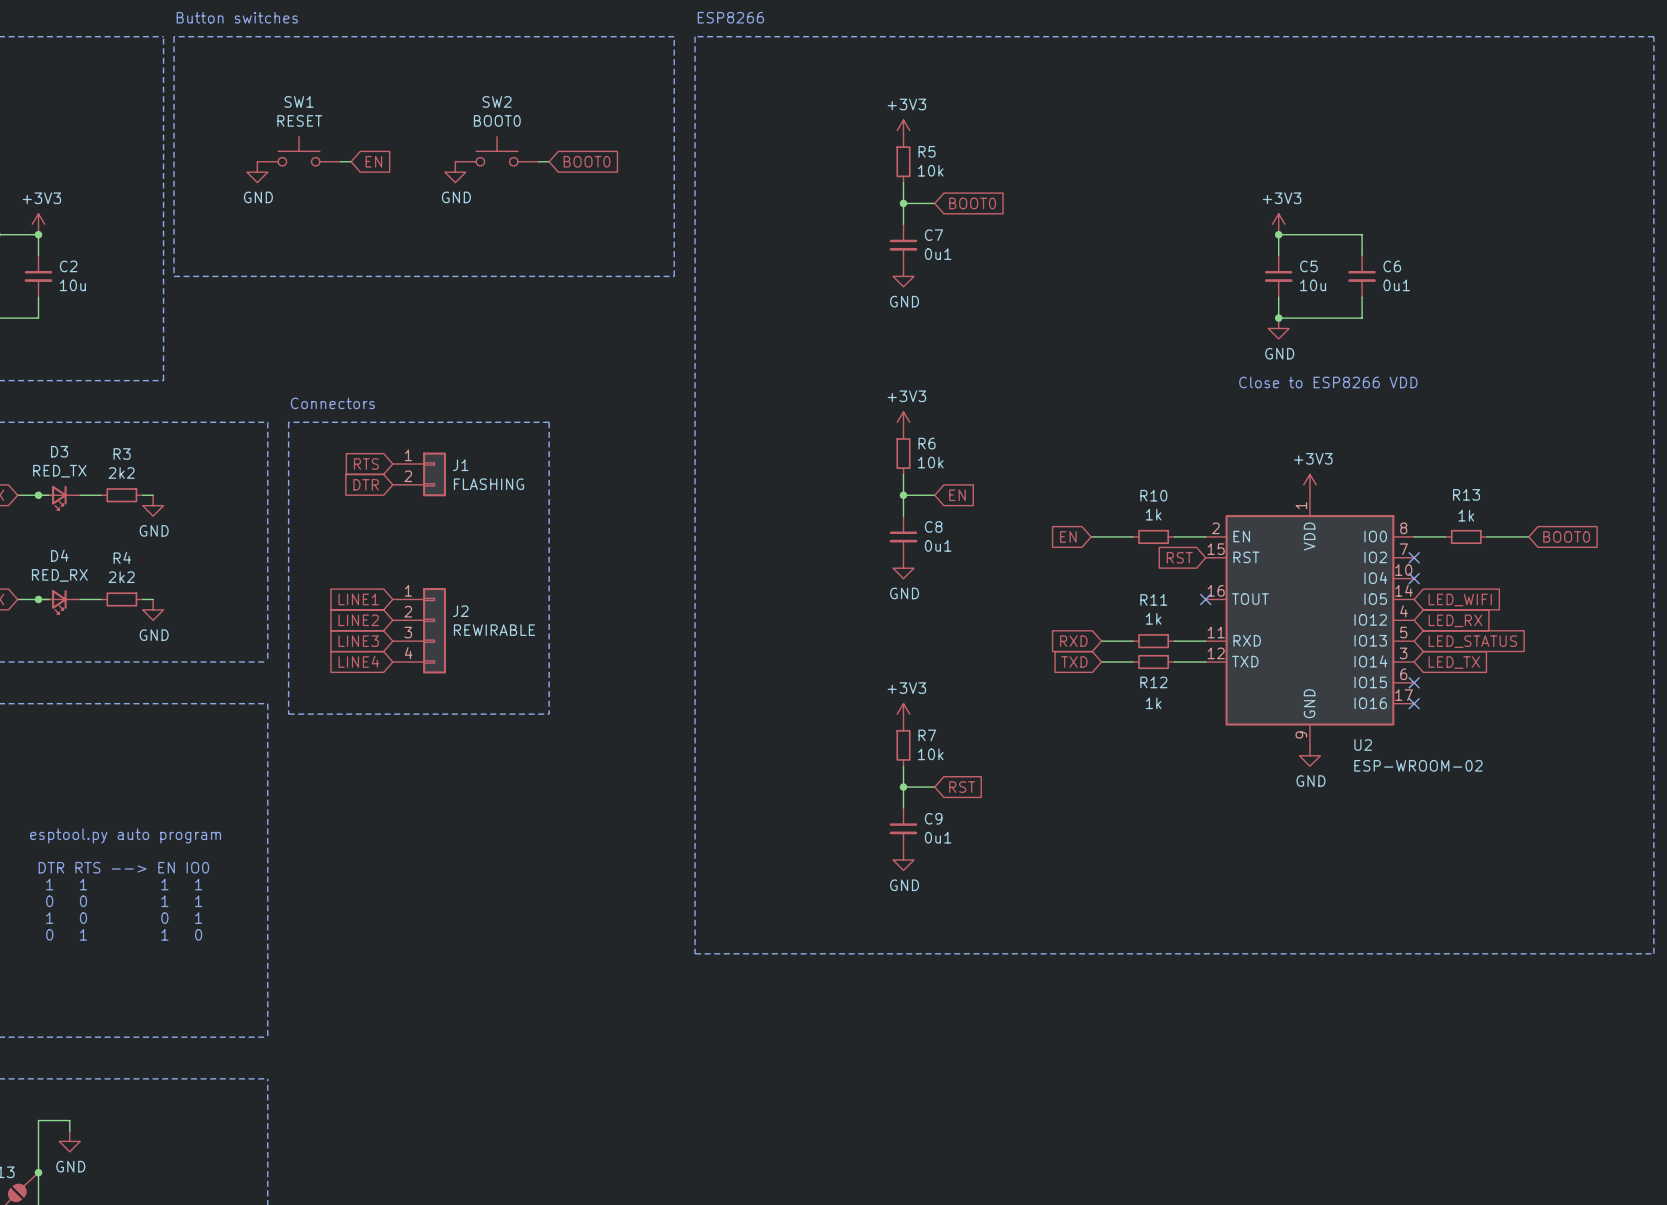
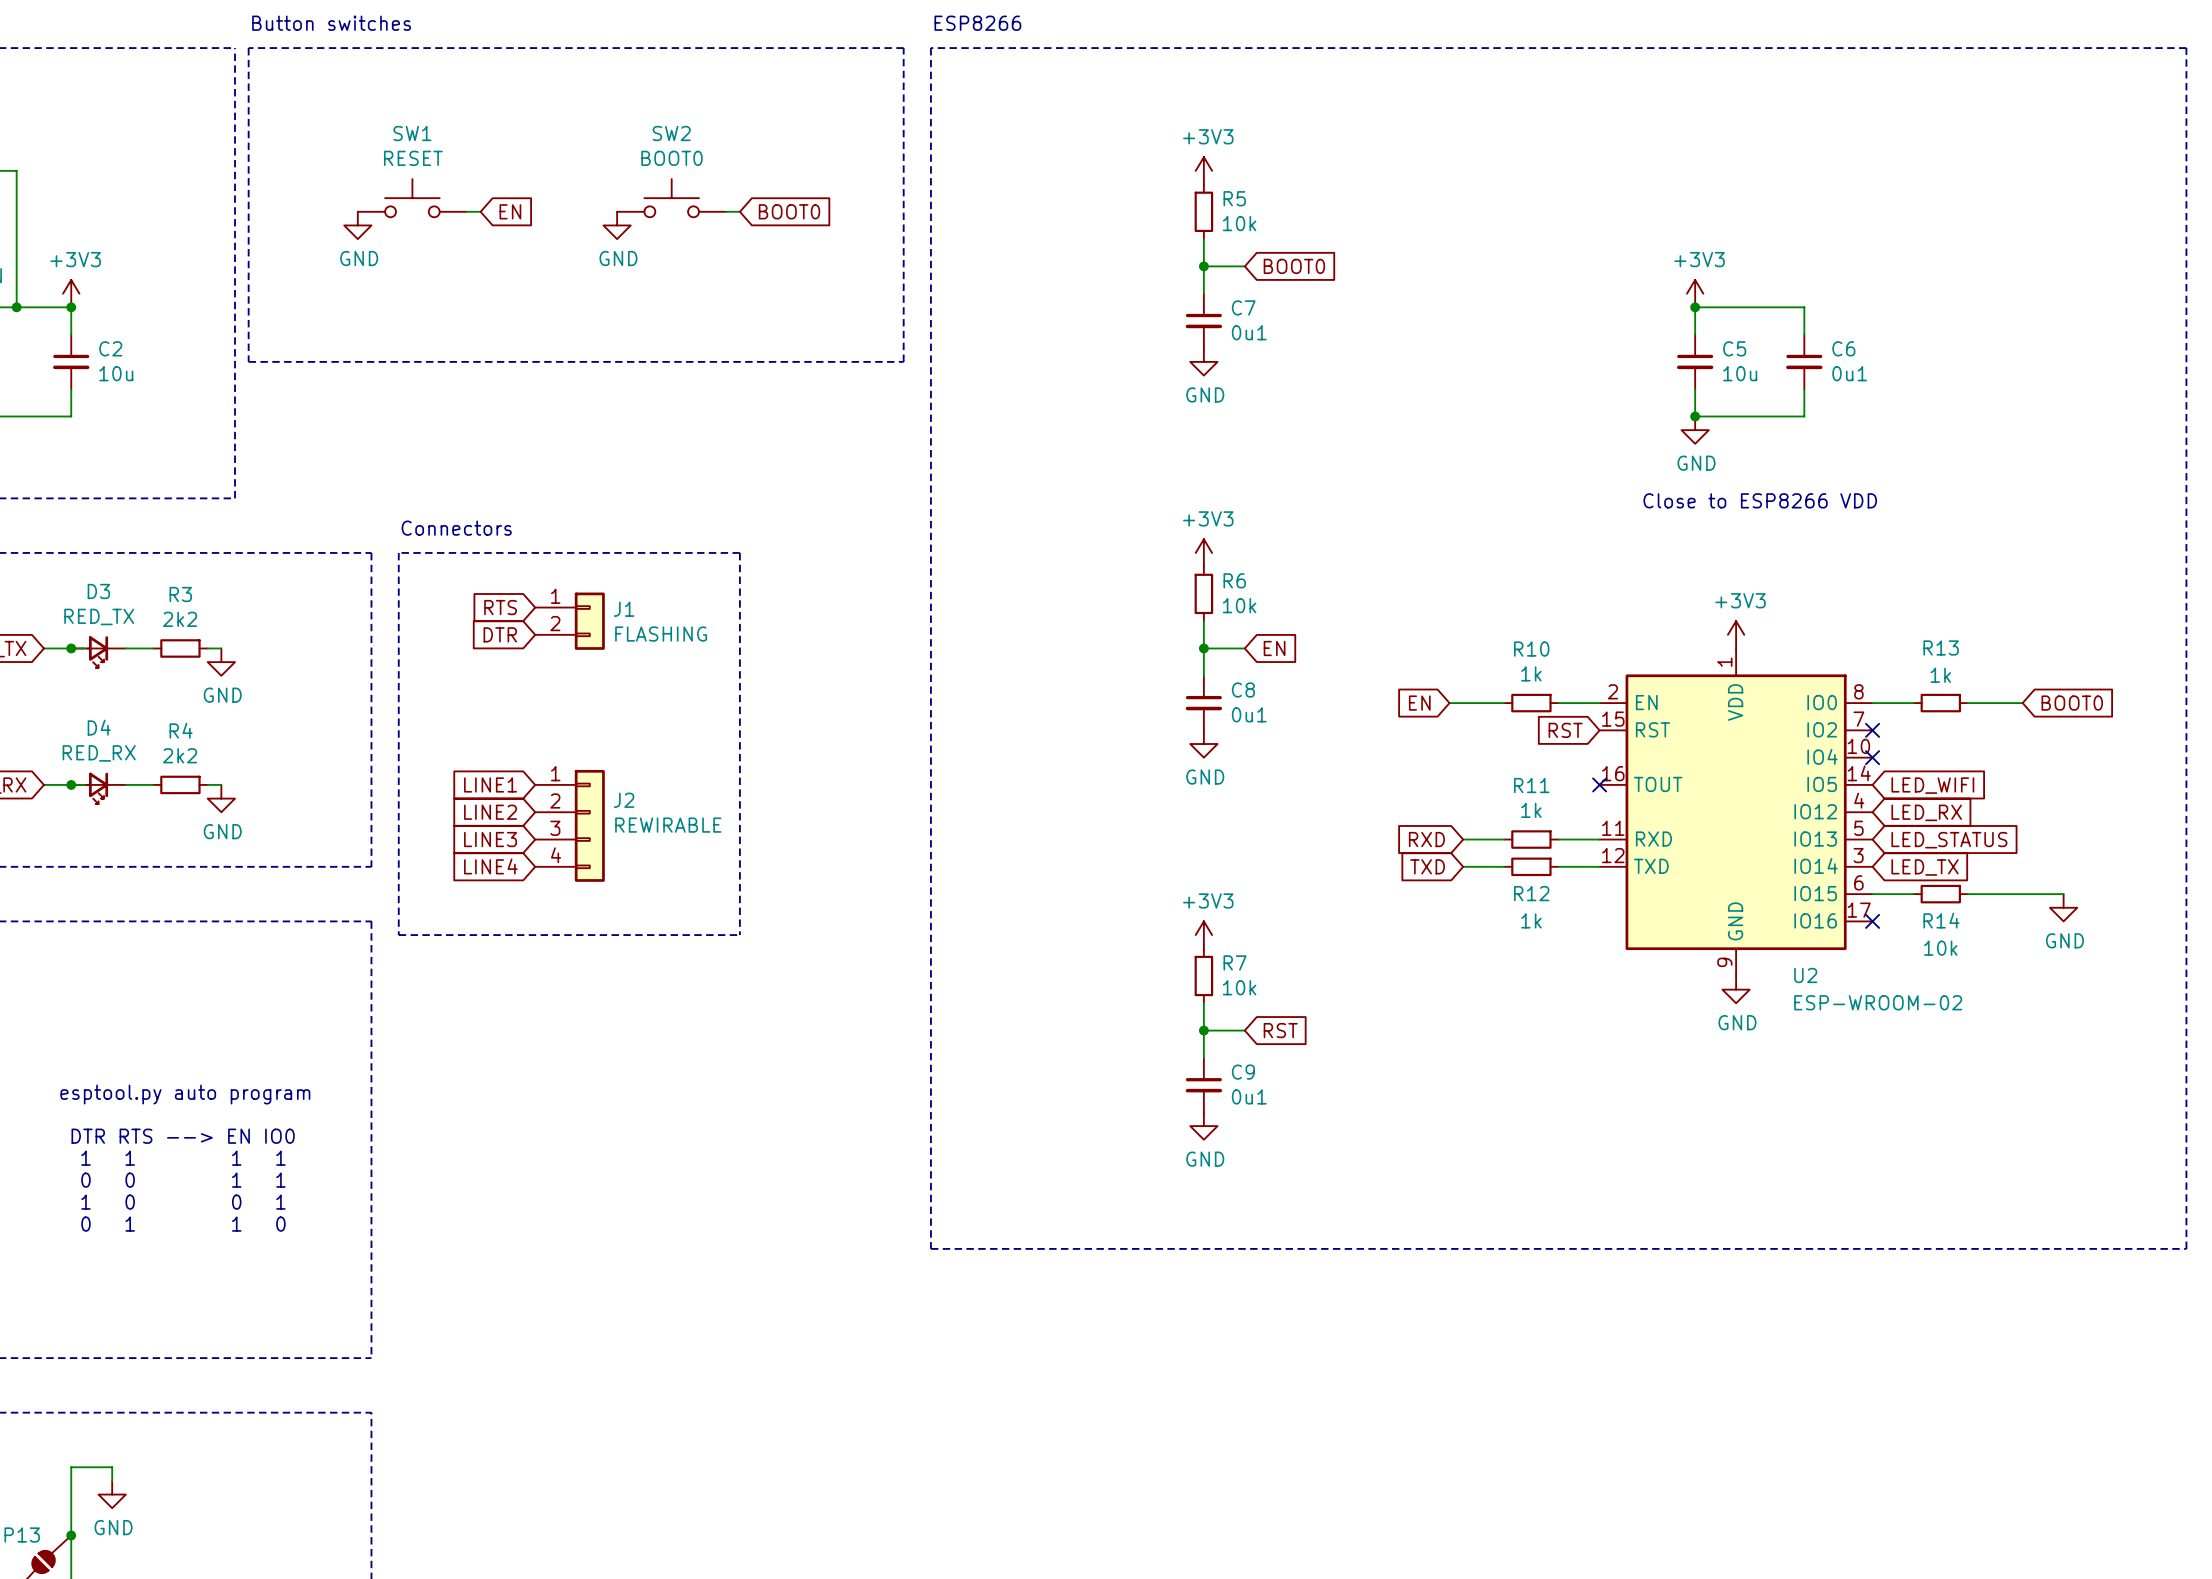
wire: none -> (1872, 894) (1913, 894)
no-connect mark: (1414, 682) -> none
R14: none -> 10k (1940, 894)
wire: none -> (1968, 894) (2063, 894)
power symbol: none -> GND (2063, 907)

